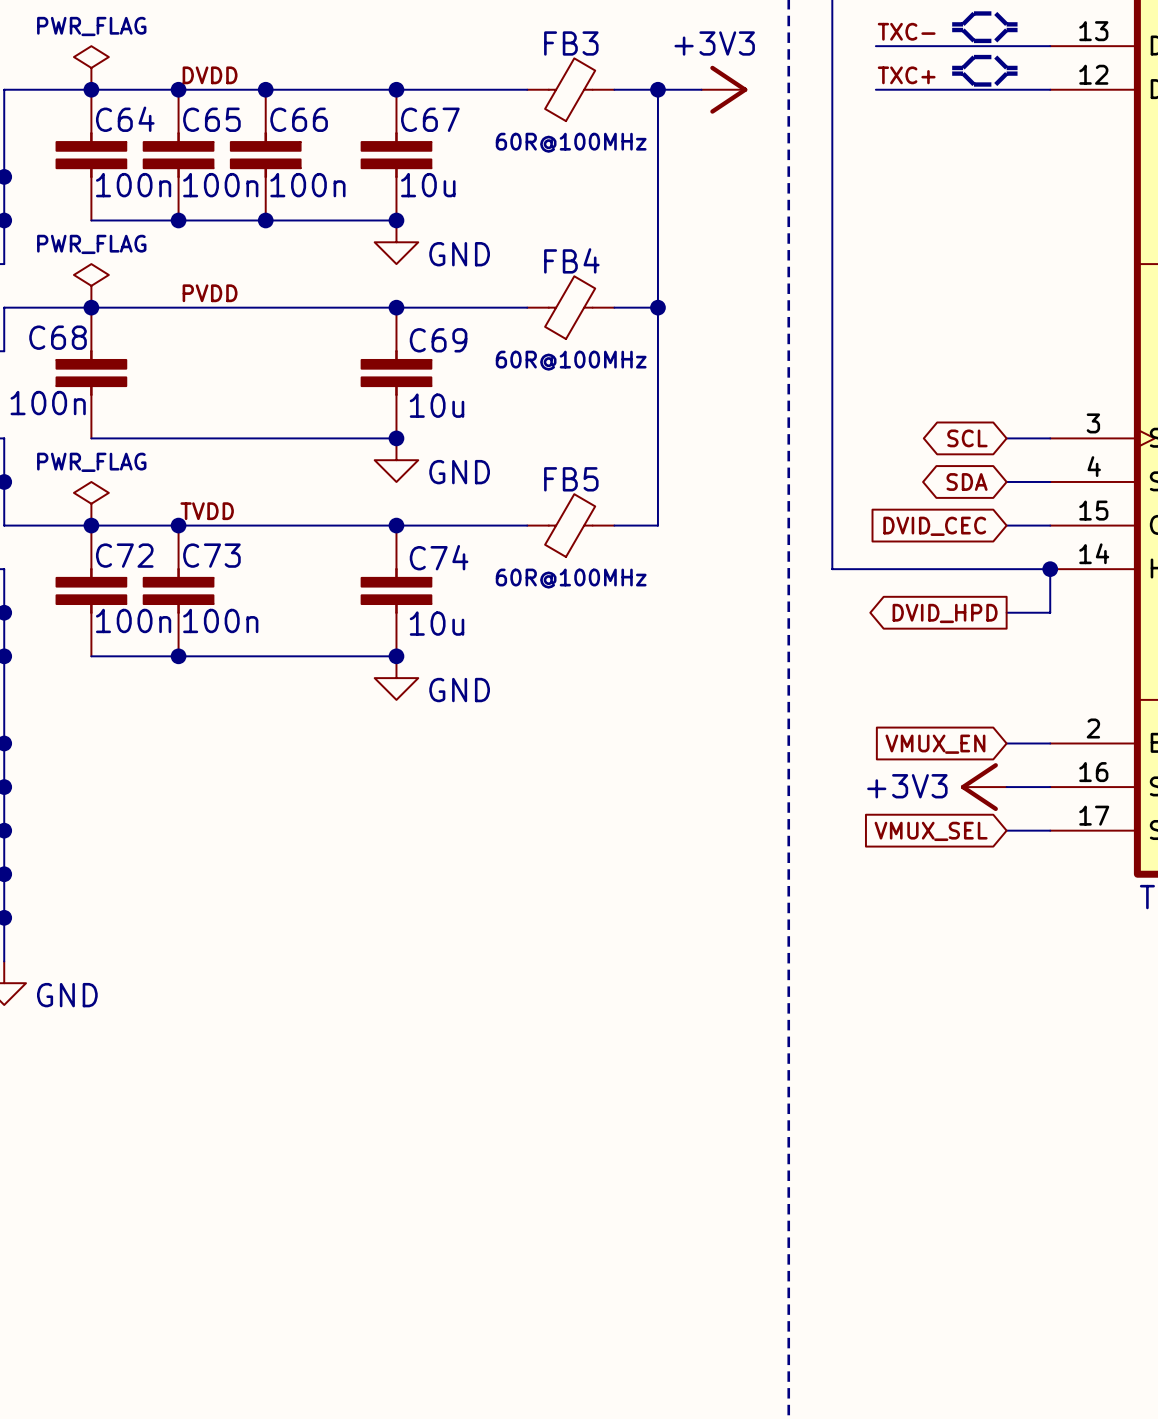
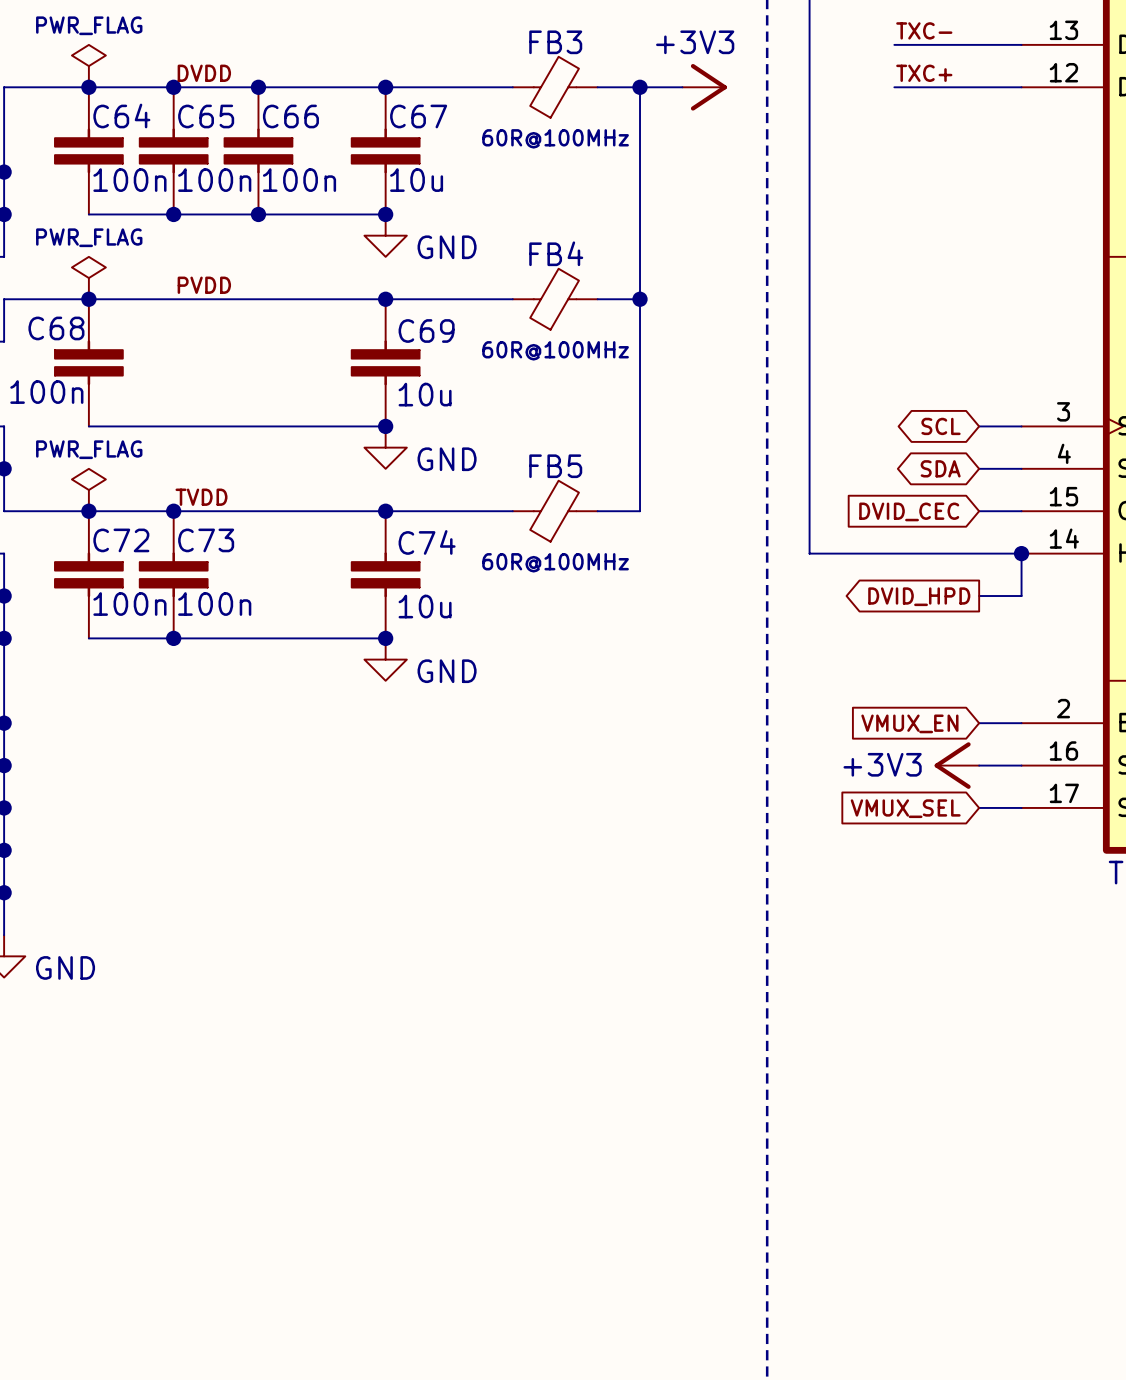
line: (952, 24) (963, 24) (973, 13) (995, 13) (1006, 24) (1017, 24) -> none
line: (952, 30) (963, 30) (973, 40) (995, 40) (1006, 30) (1017, 30) -> none
label position: TXC- (906, 31) -> TXC- (924, 30)
wire: (875, 46) (919, 46) -> none
line: (952, 67) (963, 67) (973, 57) (995, 57) (1006, 67) (1017, 67) -> none
line: (952, 73) (963, 73) (973, 84) (995, 84) (1006, 73) (1017, 73) -> none
label position: TXC+ (906, 75) -> TXC+ (924, 73)
wire: (875, 89) (919, 89) -> none

